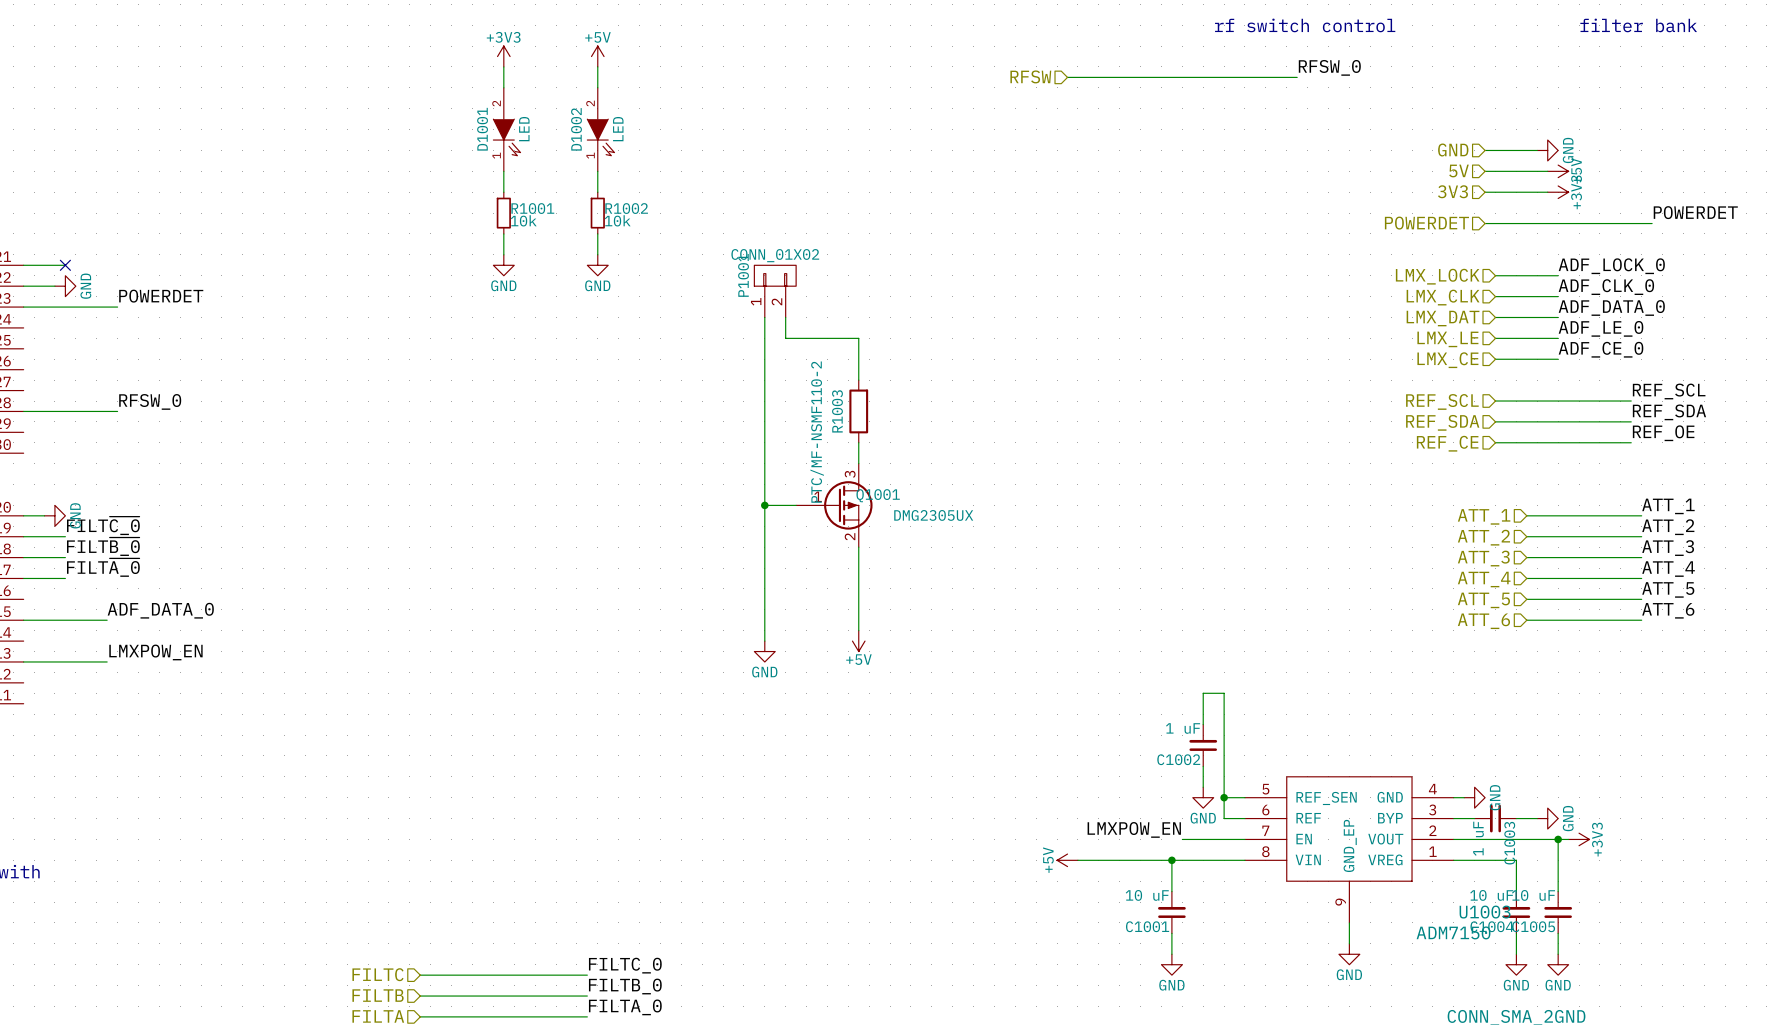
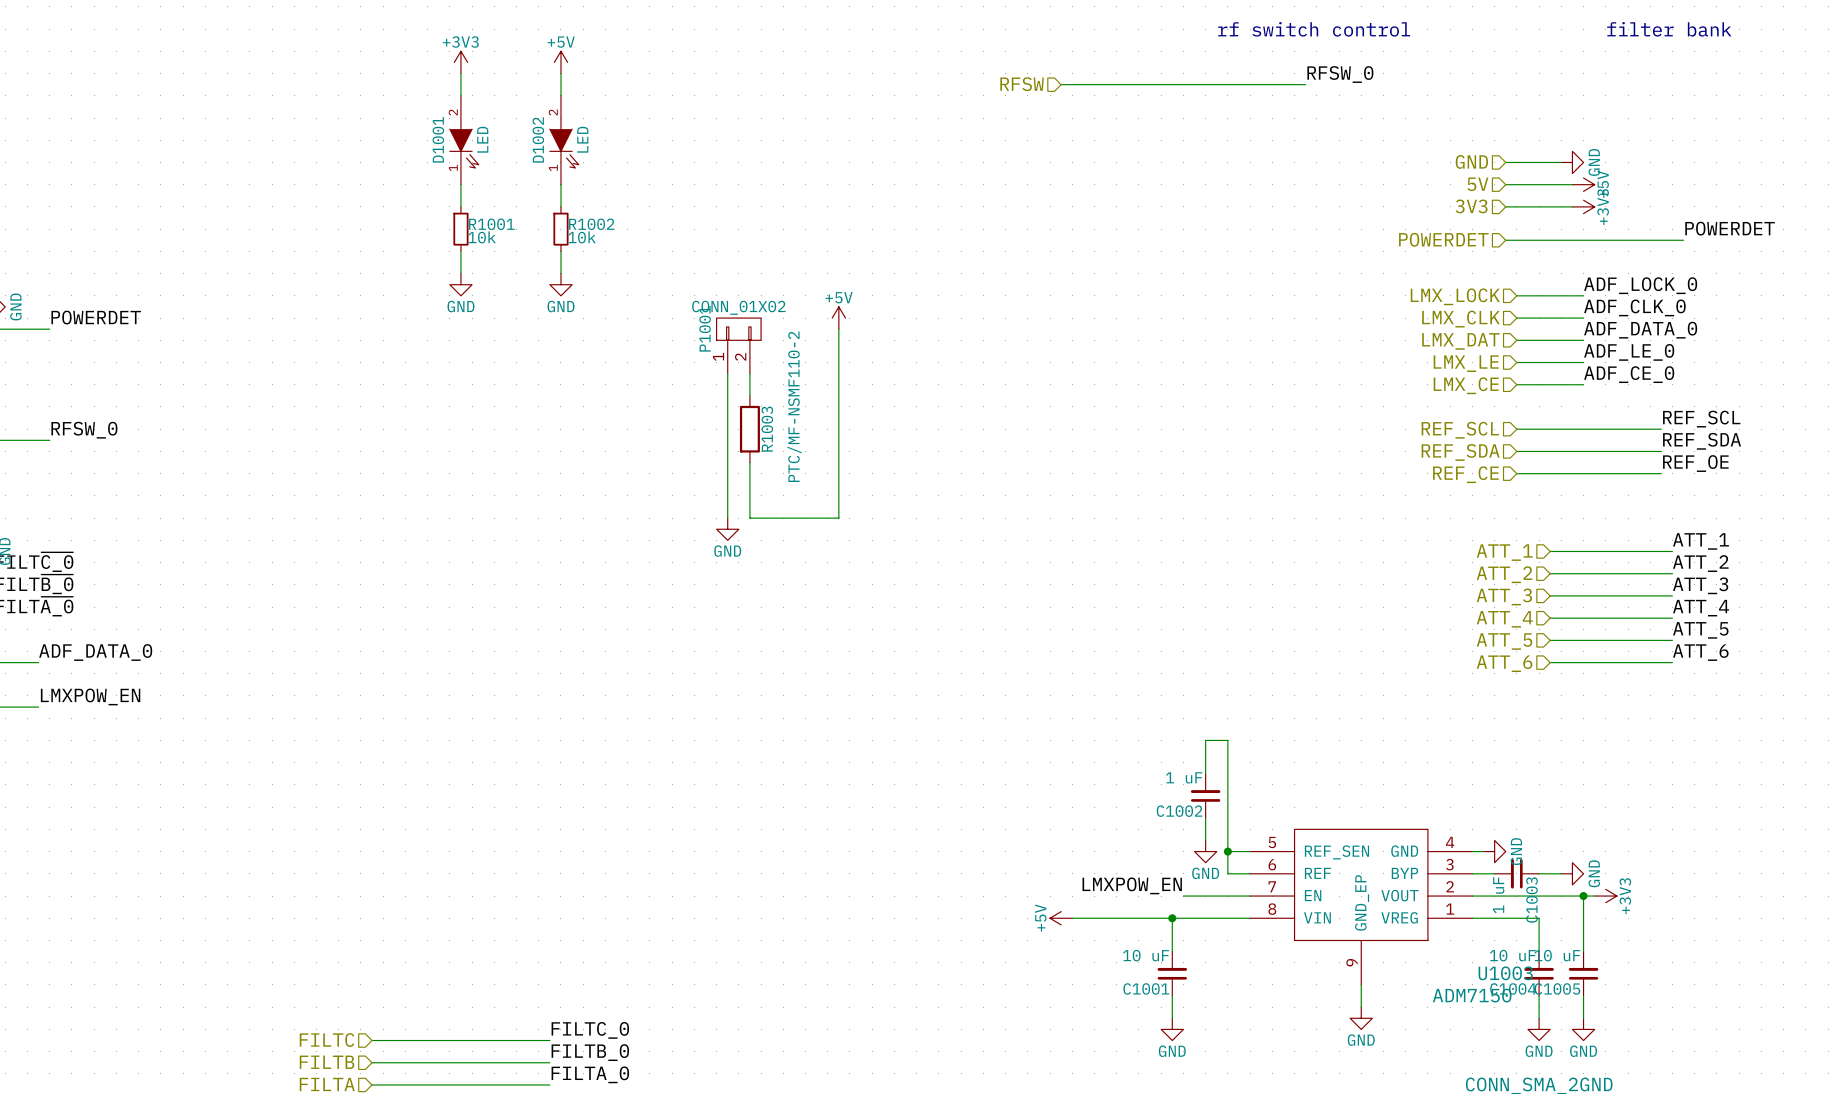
P1001 position: (775, 291) -> (738, 345)
power symbol: none -> +5V (838, 318)
wire: (764, 317) (764, 641) -> none
wire: (785, 317) (785, 338) (858, 338) -> (838, 329) (838, 362)
wire: none -> (727, 373) (727, 518)
wire: none -> (749, 373) (749, 395)
wire: none -> (838, 406) (838, 473)
R1003 name position: R1003 (837, 411) -> R1003 (767, 429)
R1003 position: (858, 411) -> (749, 429)
wire: none -> (749, 462) (749, 518) (838, 518) (838, 495)
R1003 value position: PTC/MF-NSMF110-2 (817, 432) -> PTC/MF-NSMF110-2 (794, 406)
wire: (764, 505) (796, 505) -> none
junction: (764, 505) -> none
Q1001: DMG2305UX (834, 505) -> none
wire: (858, 547) (858, 630) -> none
power symbol: +5V (858, 641) -> none
power symbol position: GND (764, 651) -> GND (727, 529)

